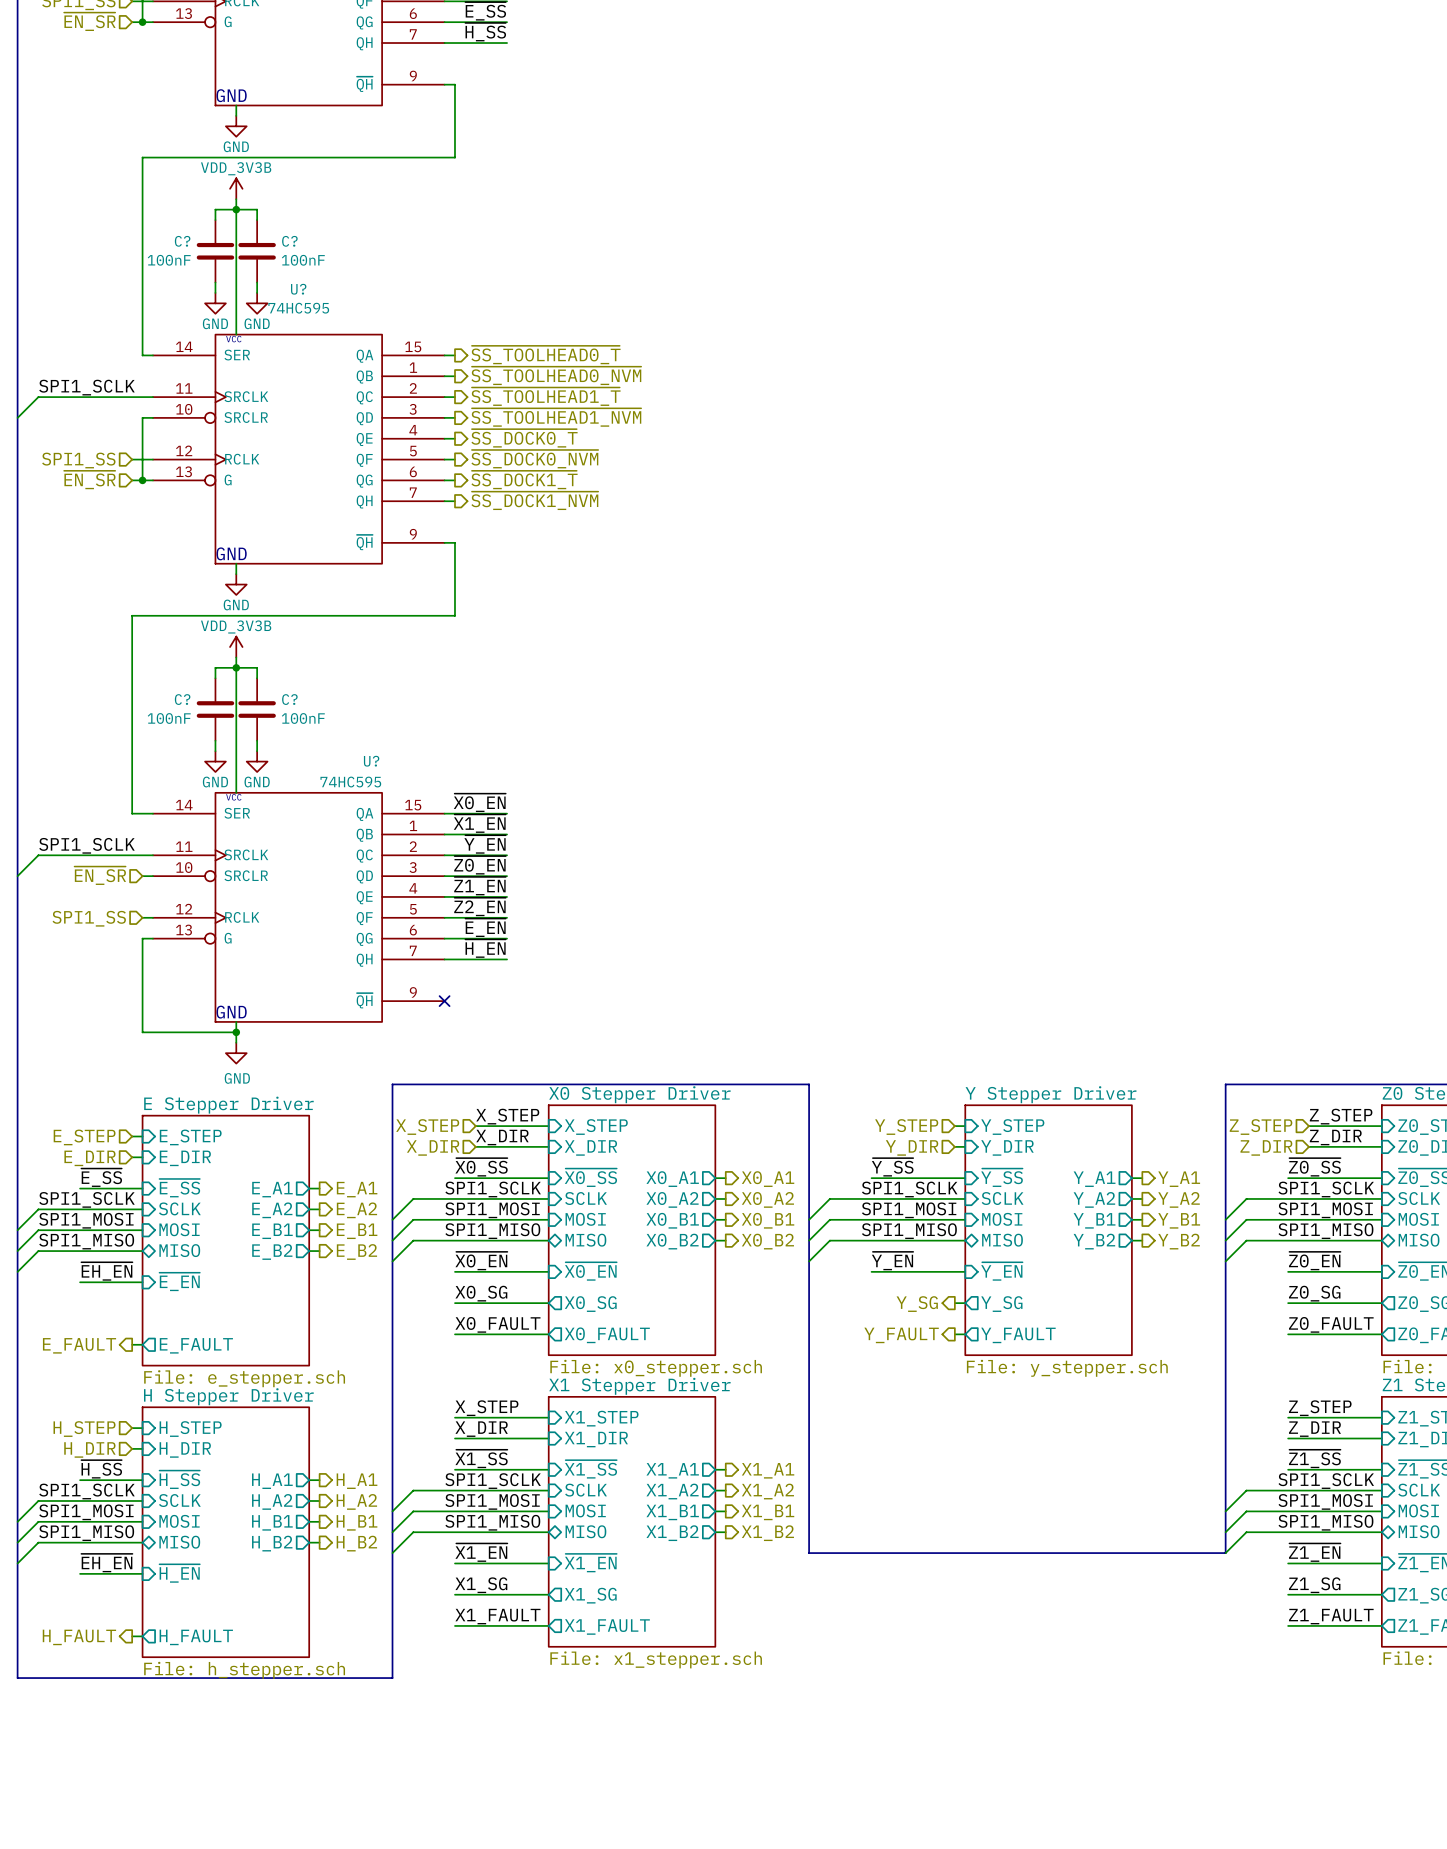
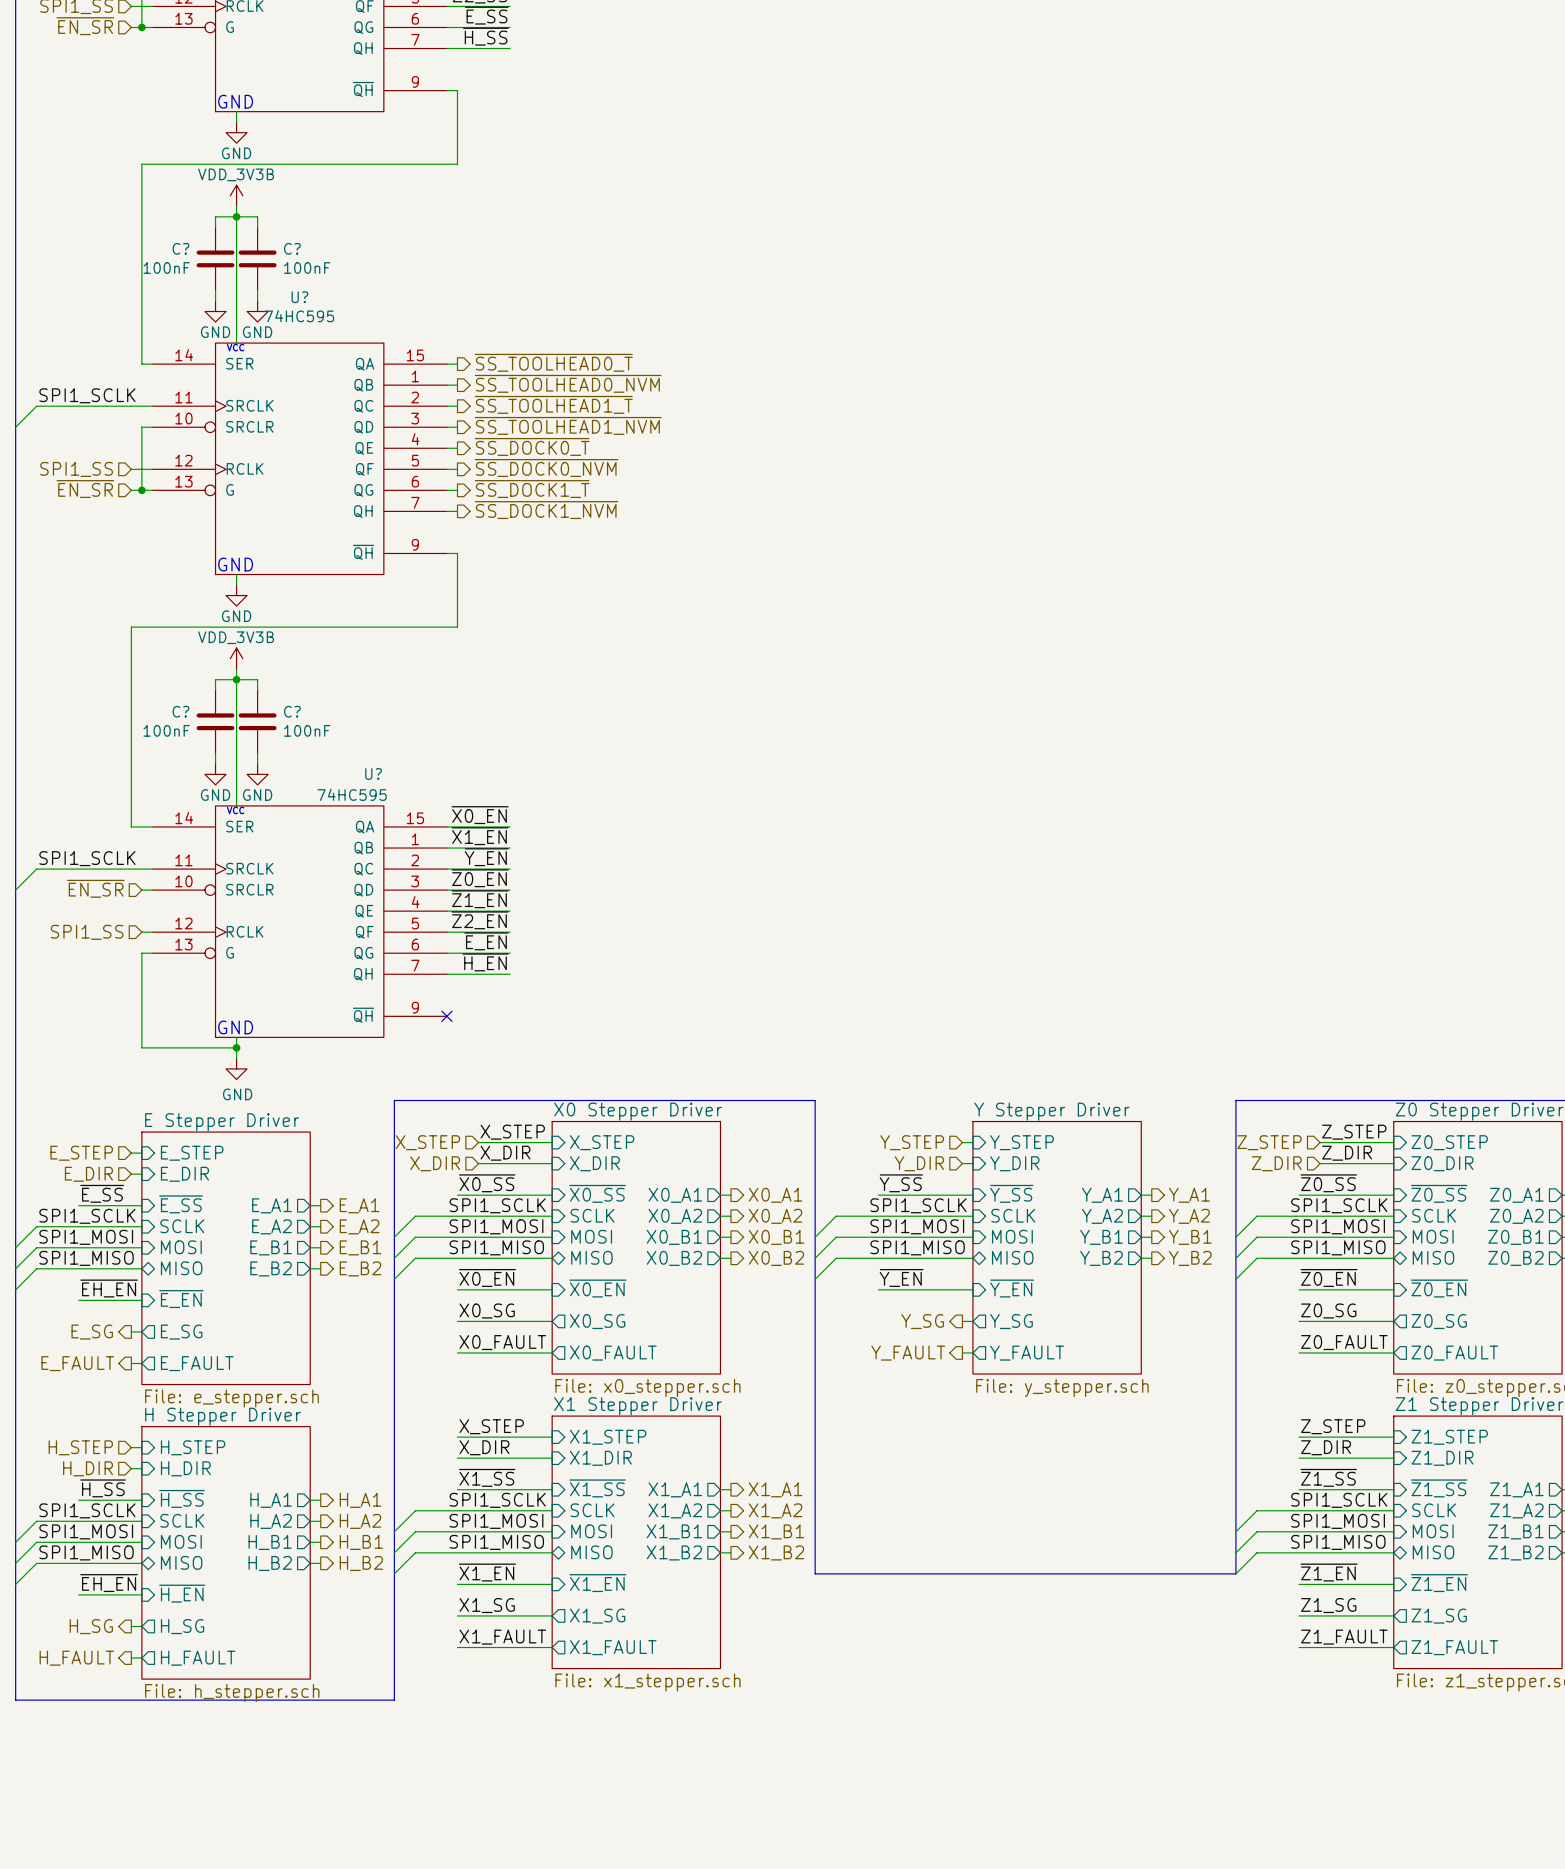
wire: none -> (131, 1331) (141, 1331)
hierarchical label: none -> E_SG (92, 1332)
sheet pin: none -> E_SG (181, 1332)
wire: none -> (131, 1626) (141, 1626)
hierarchical label: none -> H_SG (91, 1626)
sheet pin: none -> H_SG (182, 1626)

